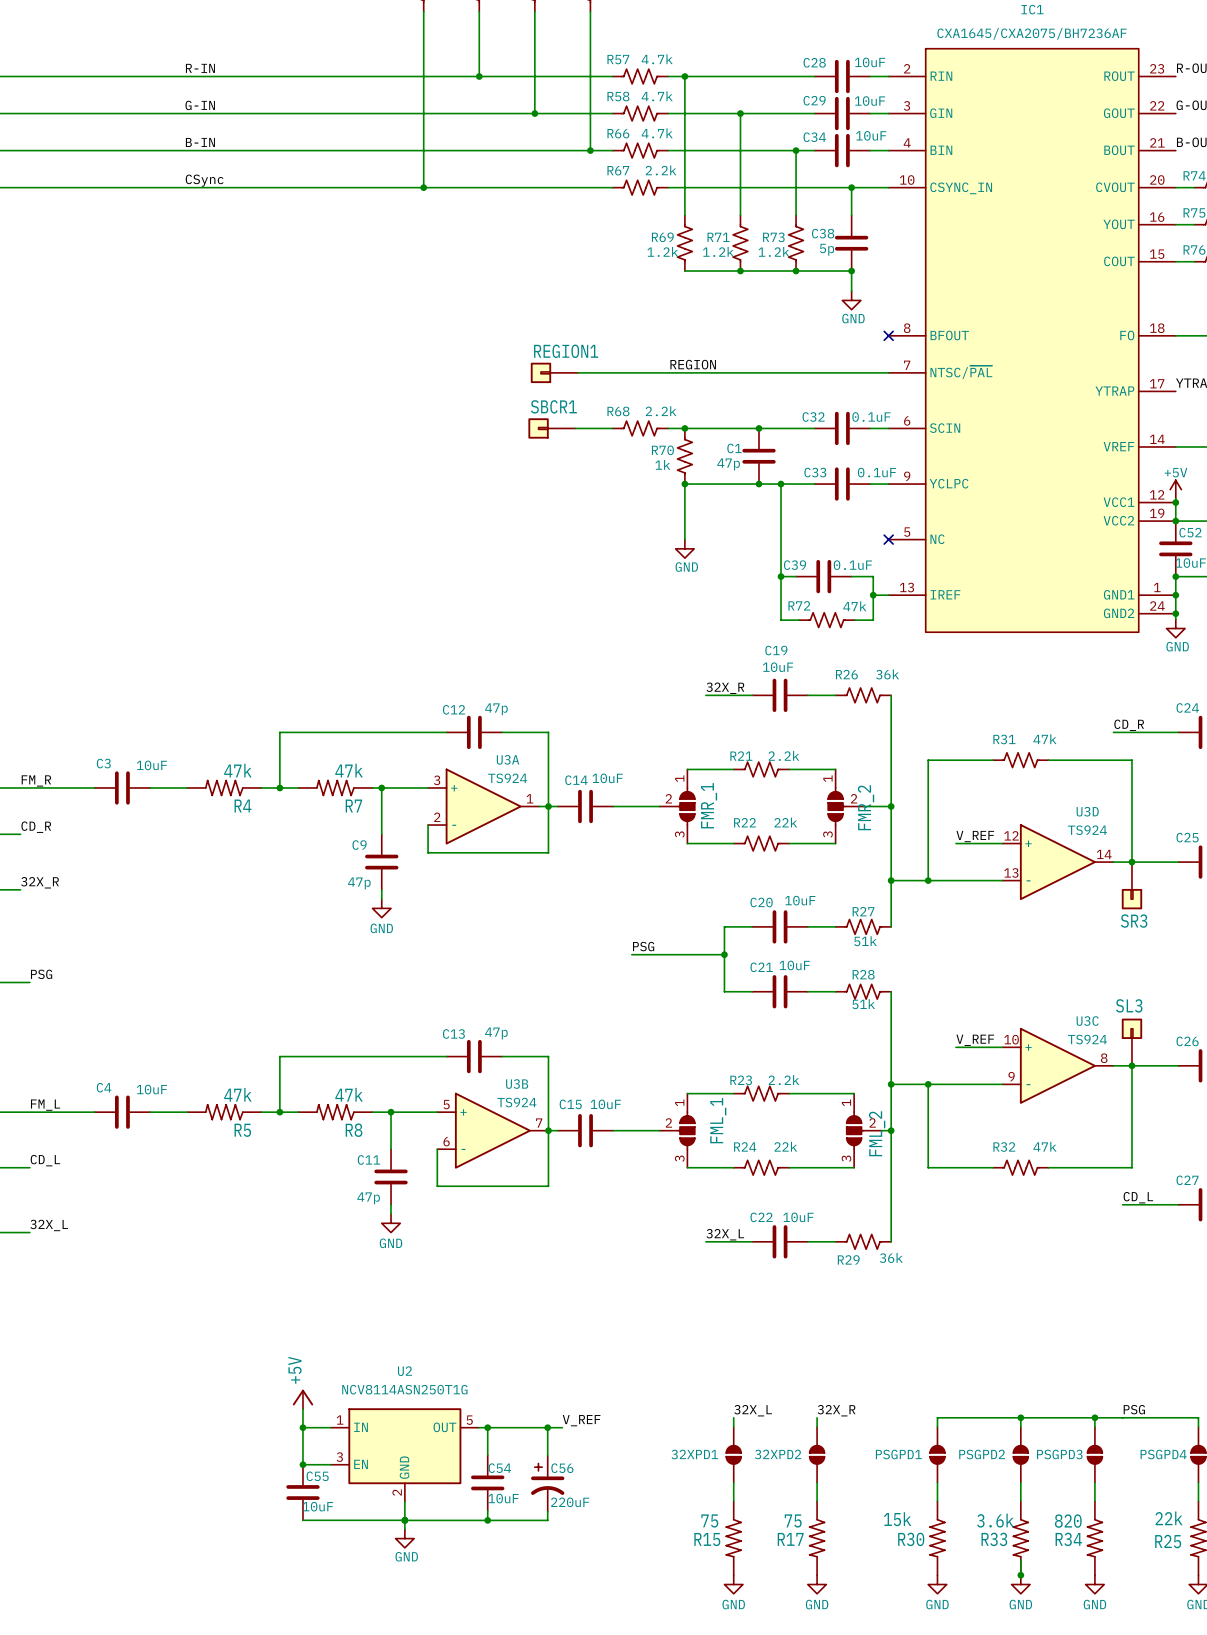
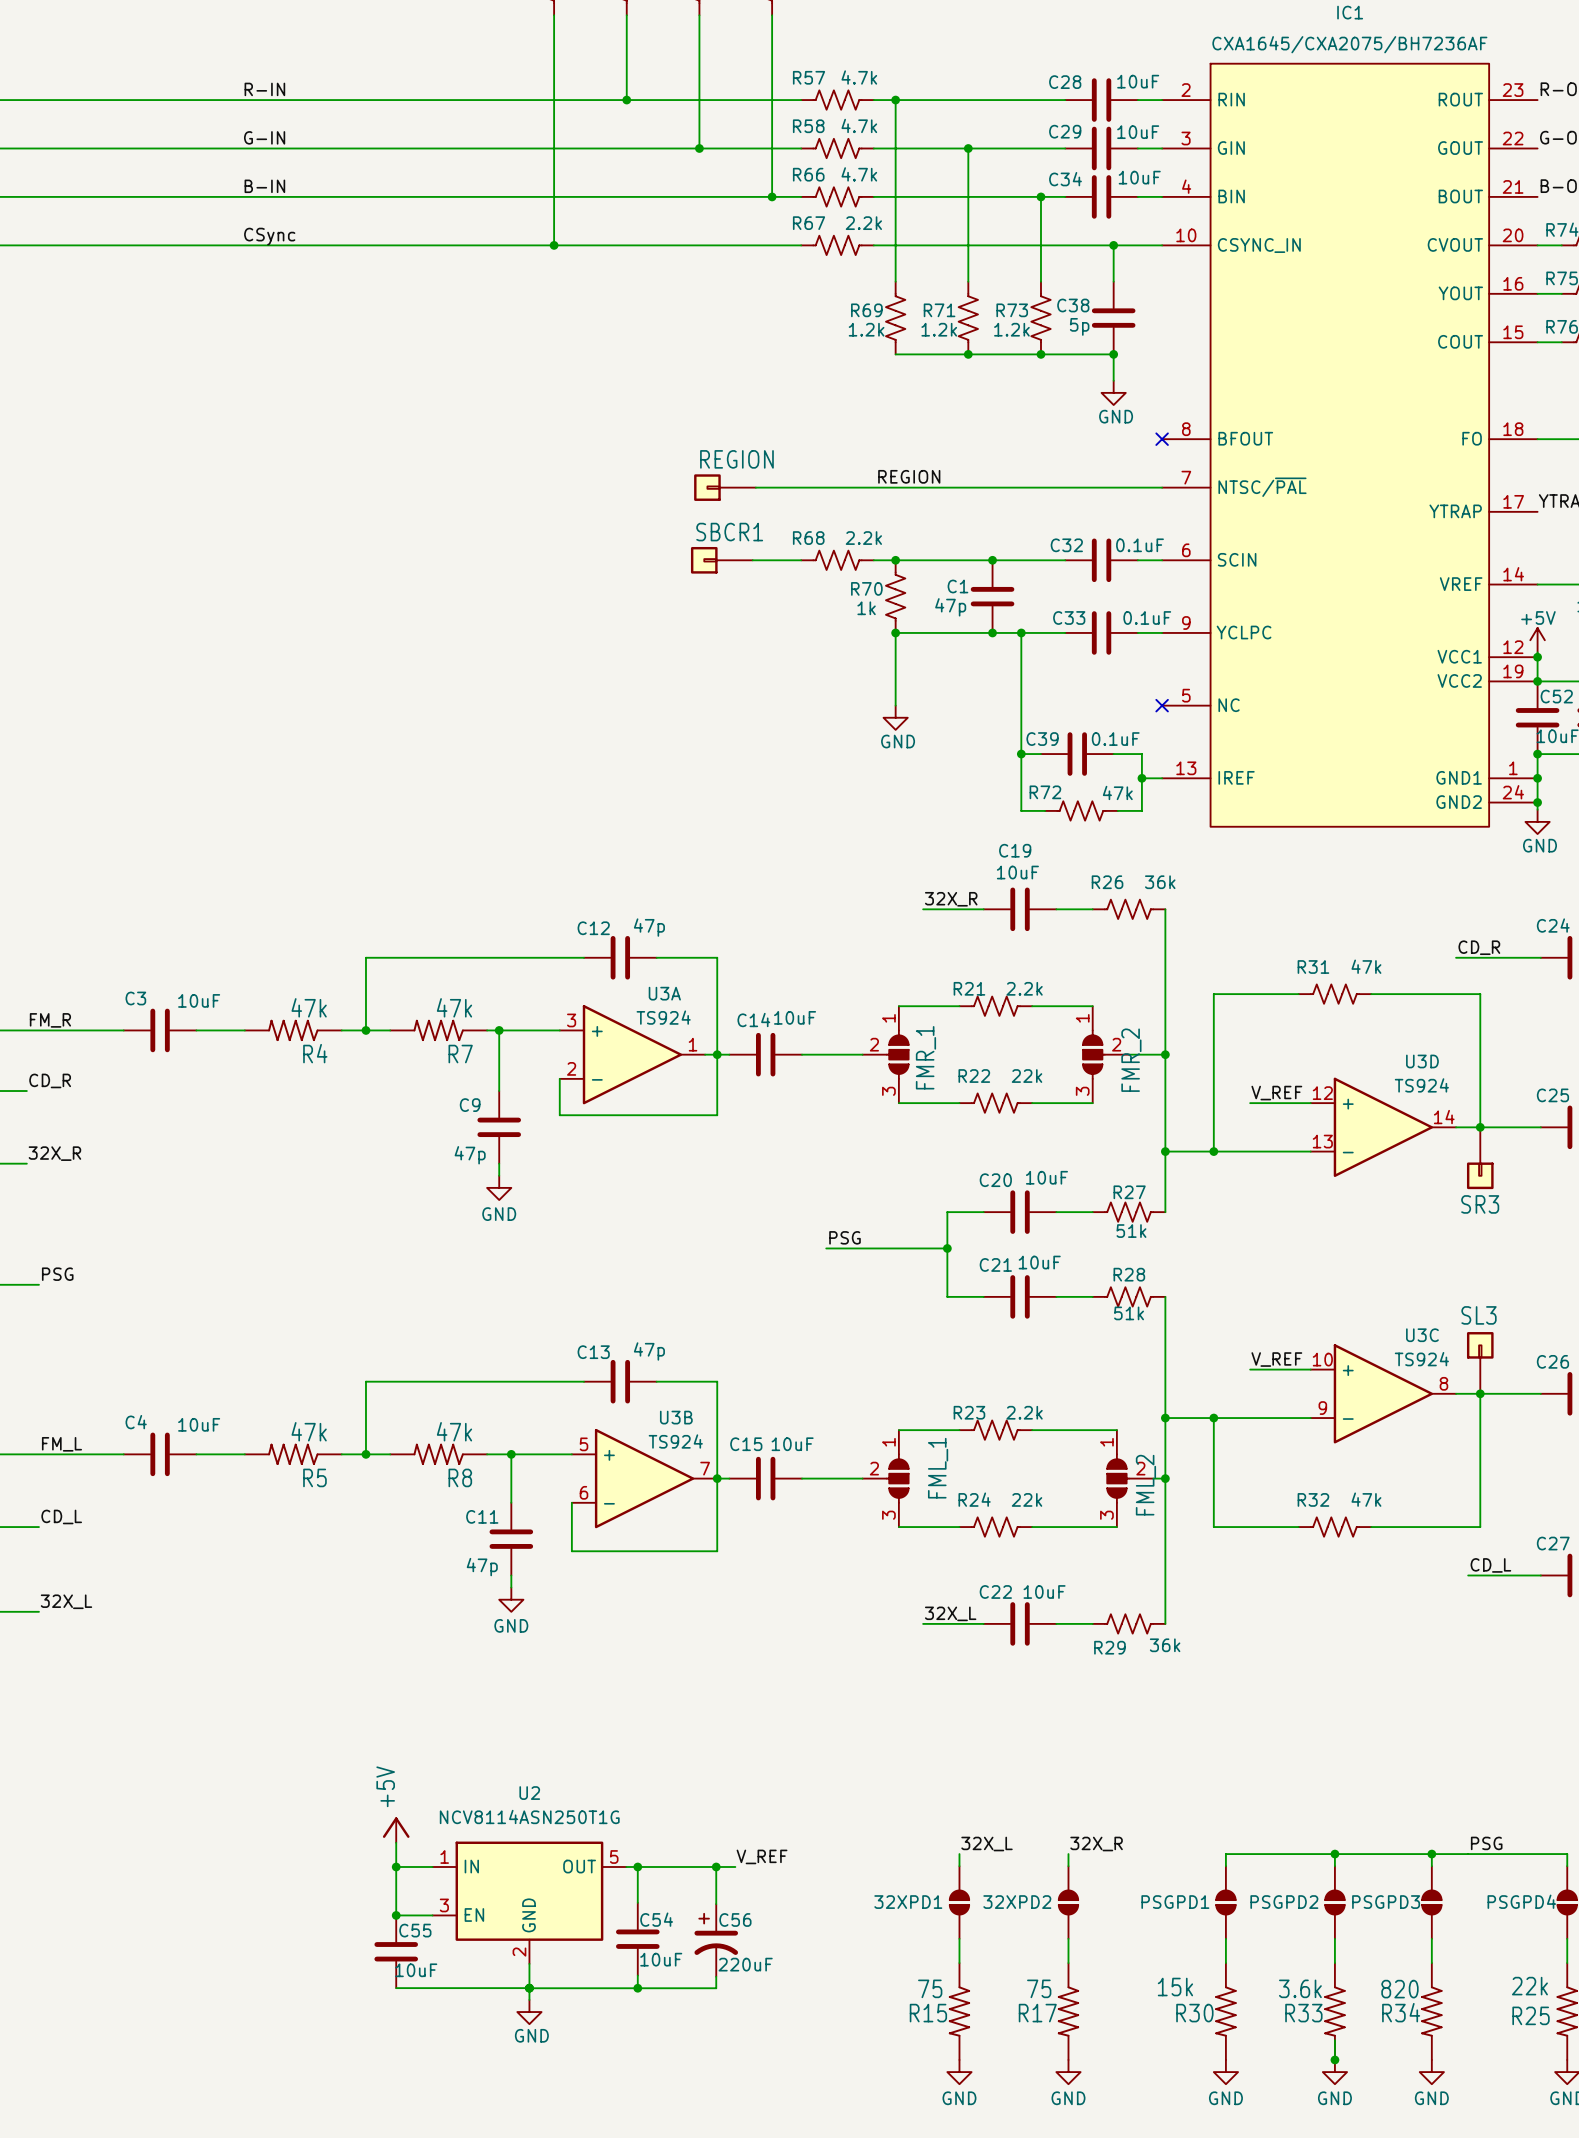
REGION1 name: REGION1 (566, 351) -> REGION (736, 459)

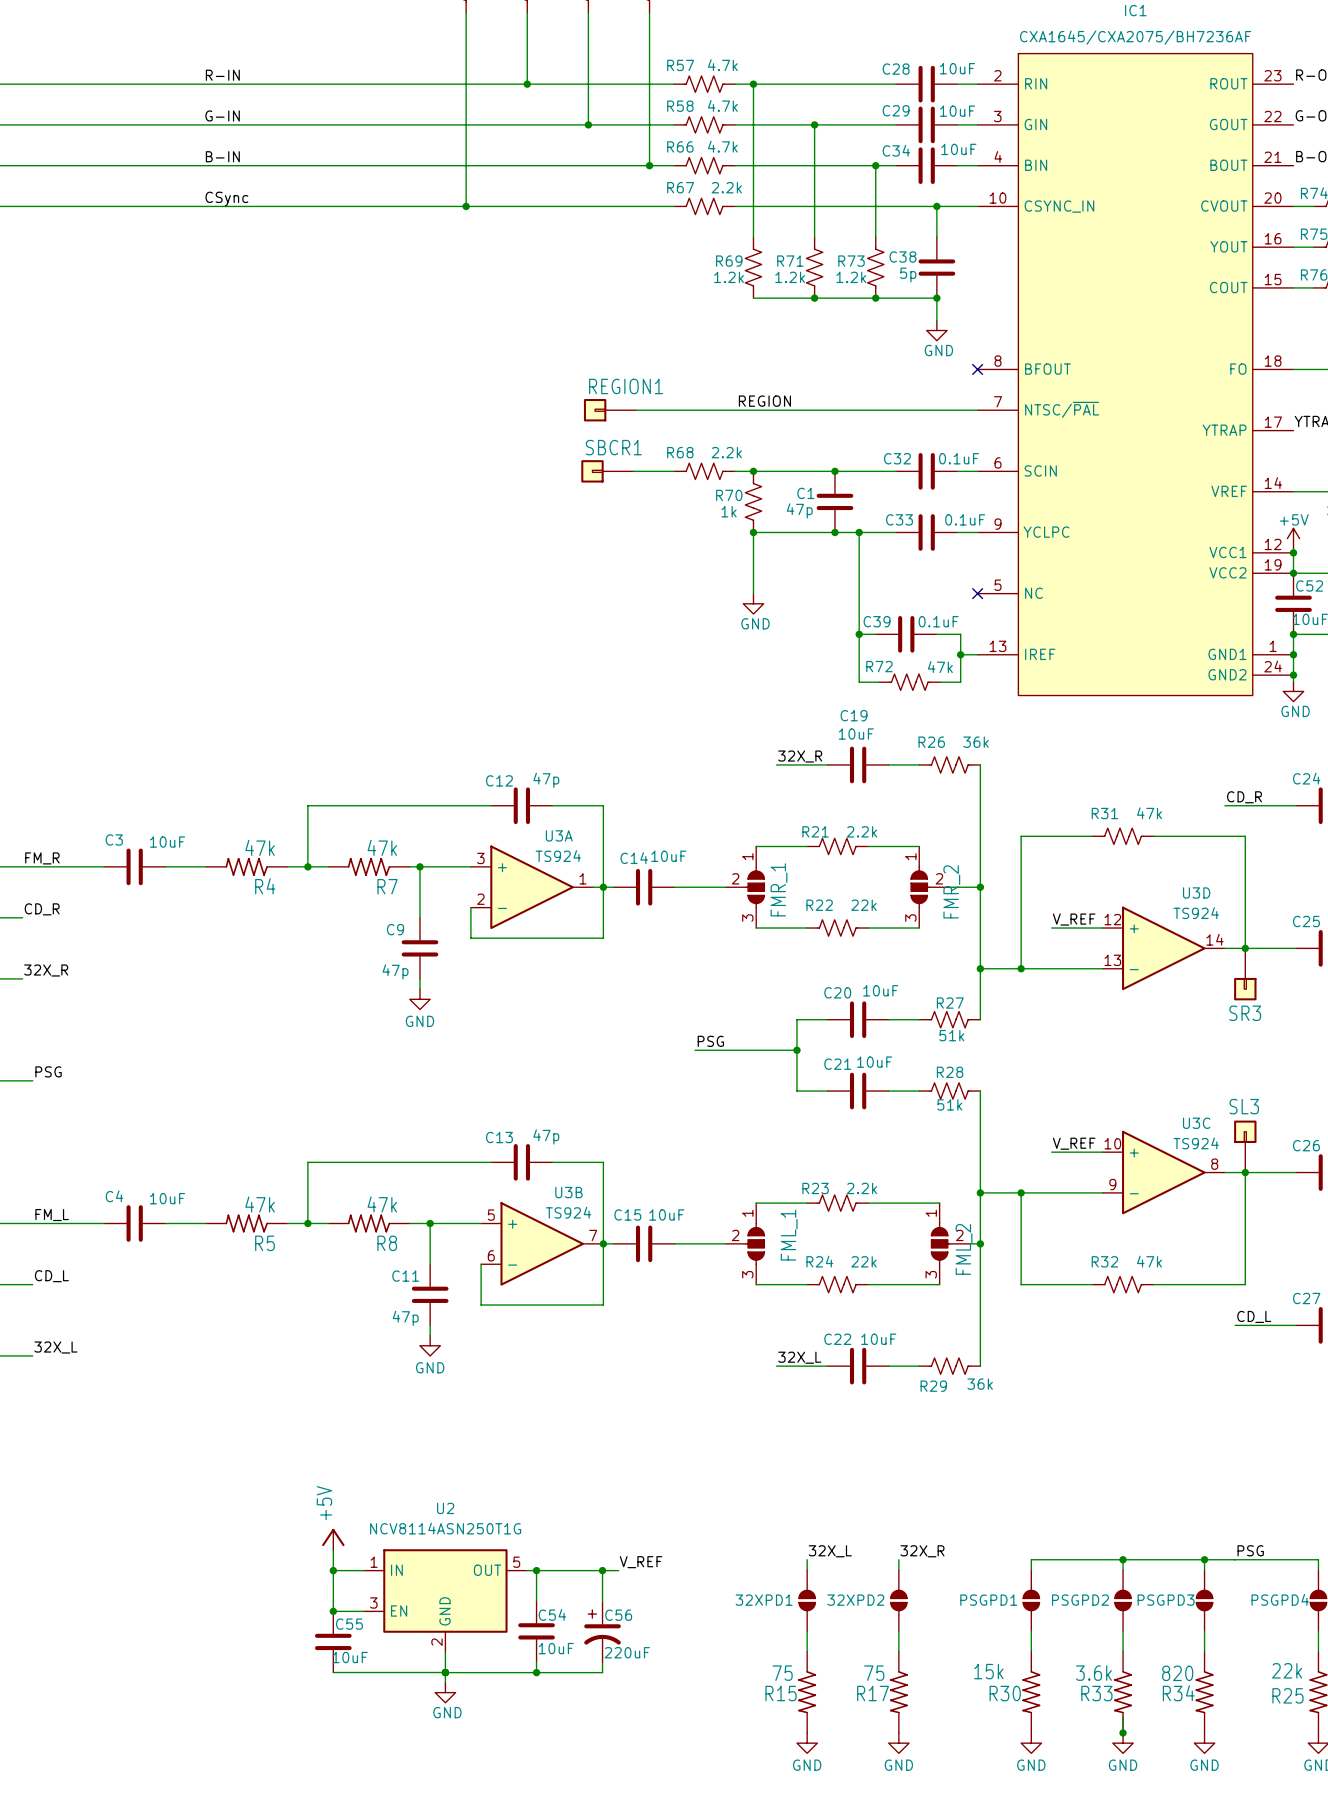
REGION name: REGION (736, 459) -> REGION1 (626, 386)

